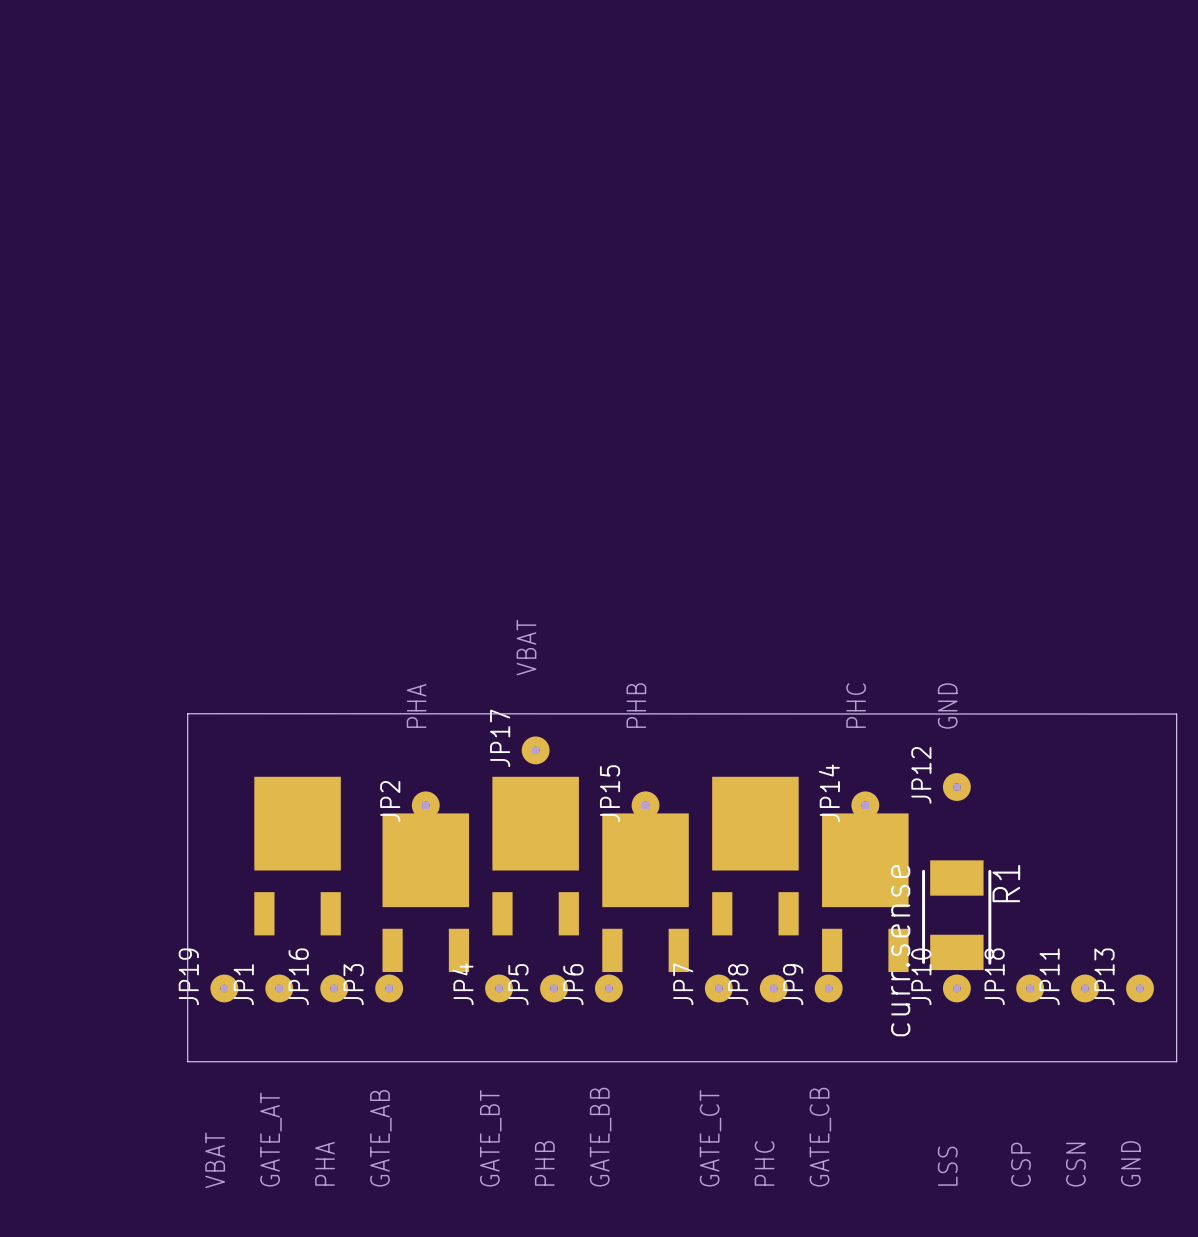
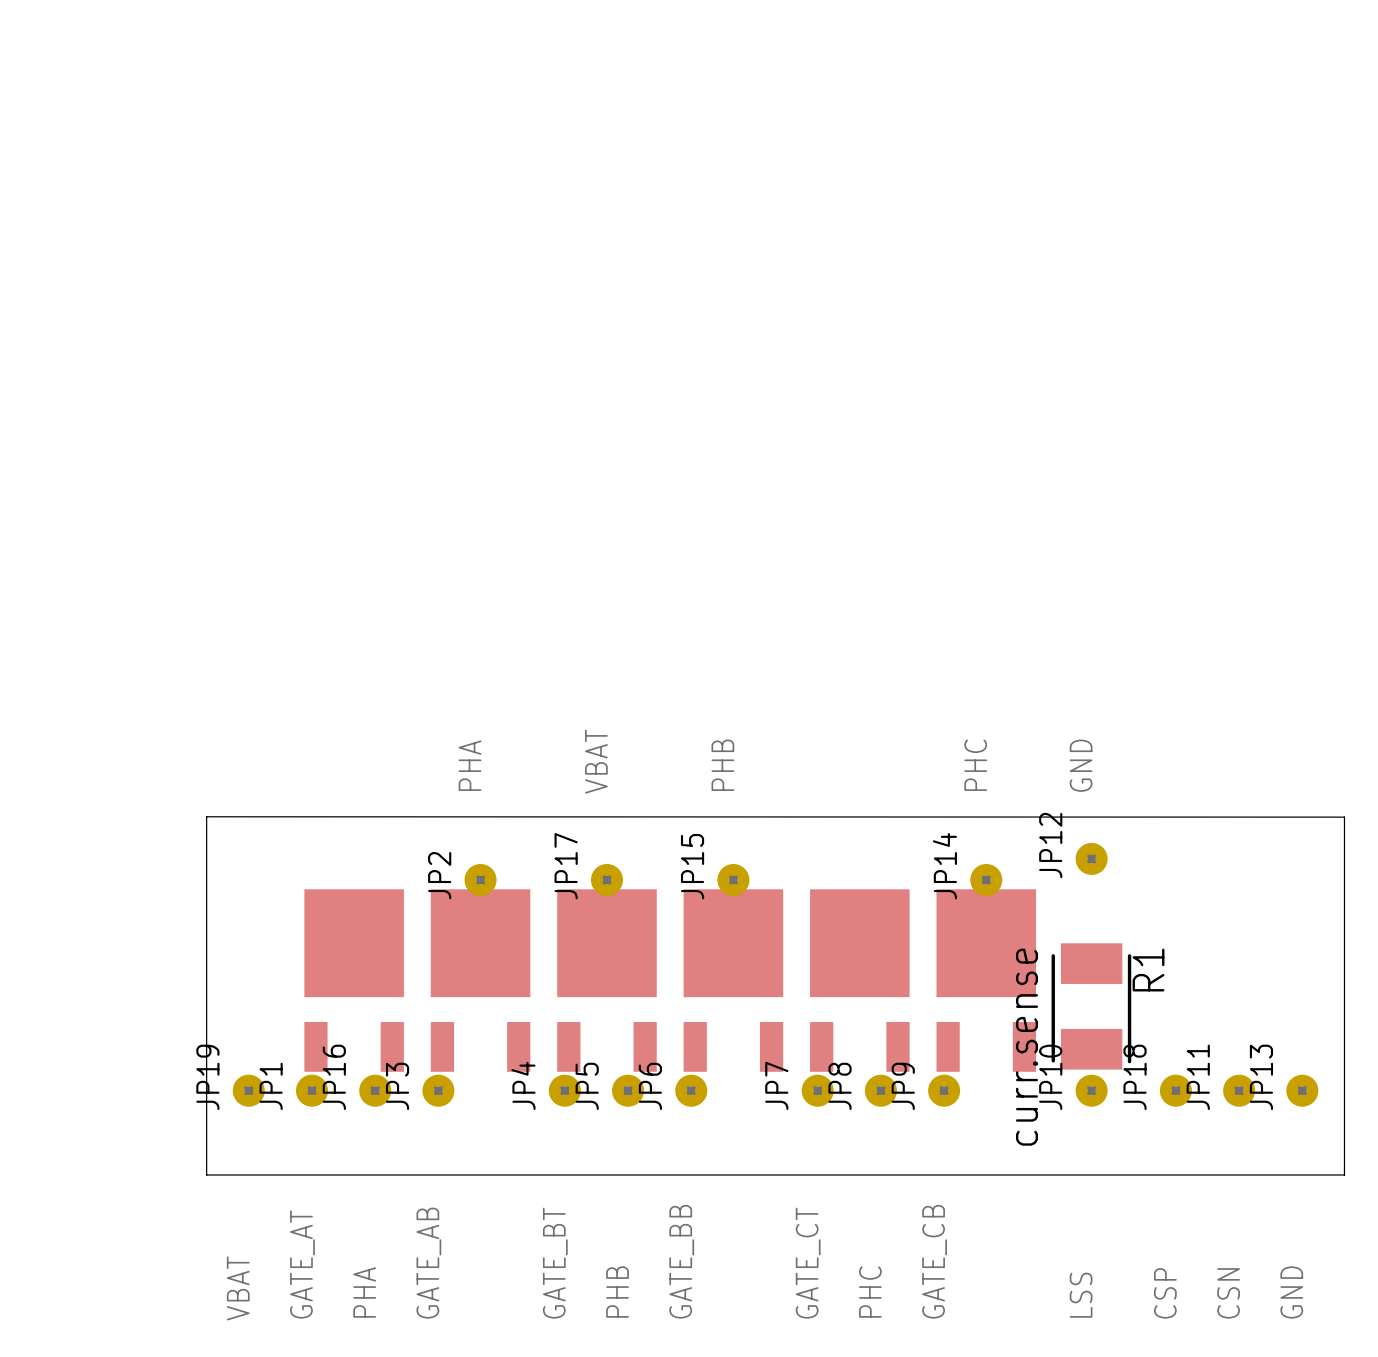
board edge: (187, 750) (187, 713) (1176, 714) (1176, 750) -> (206, 816) (1344, 817)
JP17 position: (535, 750) -> (606, 880)
part position: (297, 856) -> (354, 980)
part position: (535, 856) -> (606, 980)
part position: (755, 856) -> (859, 980)

